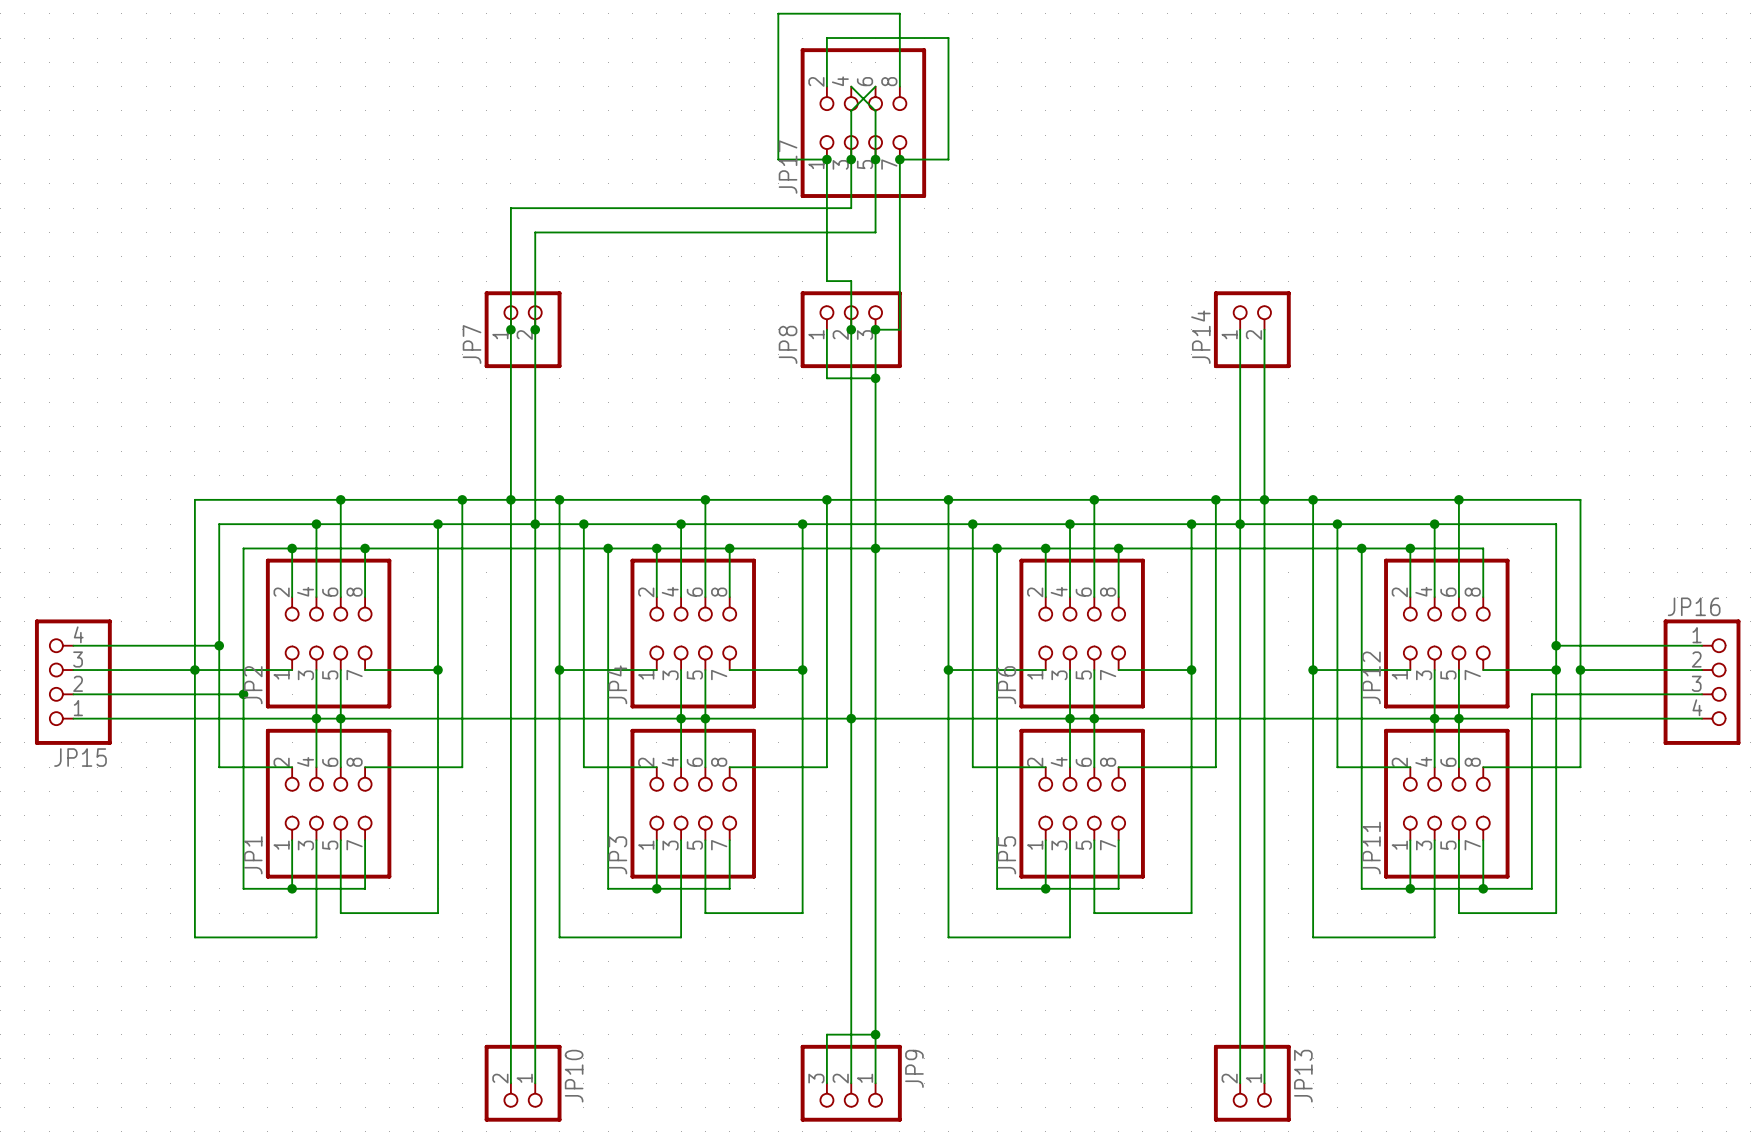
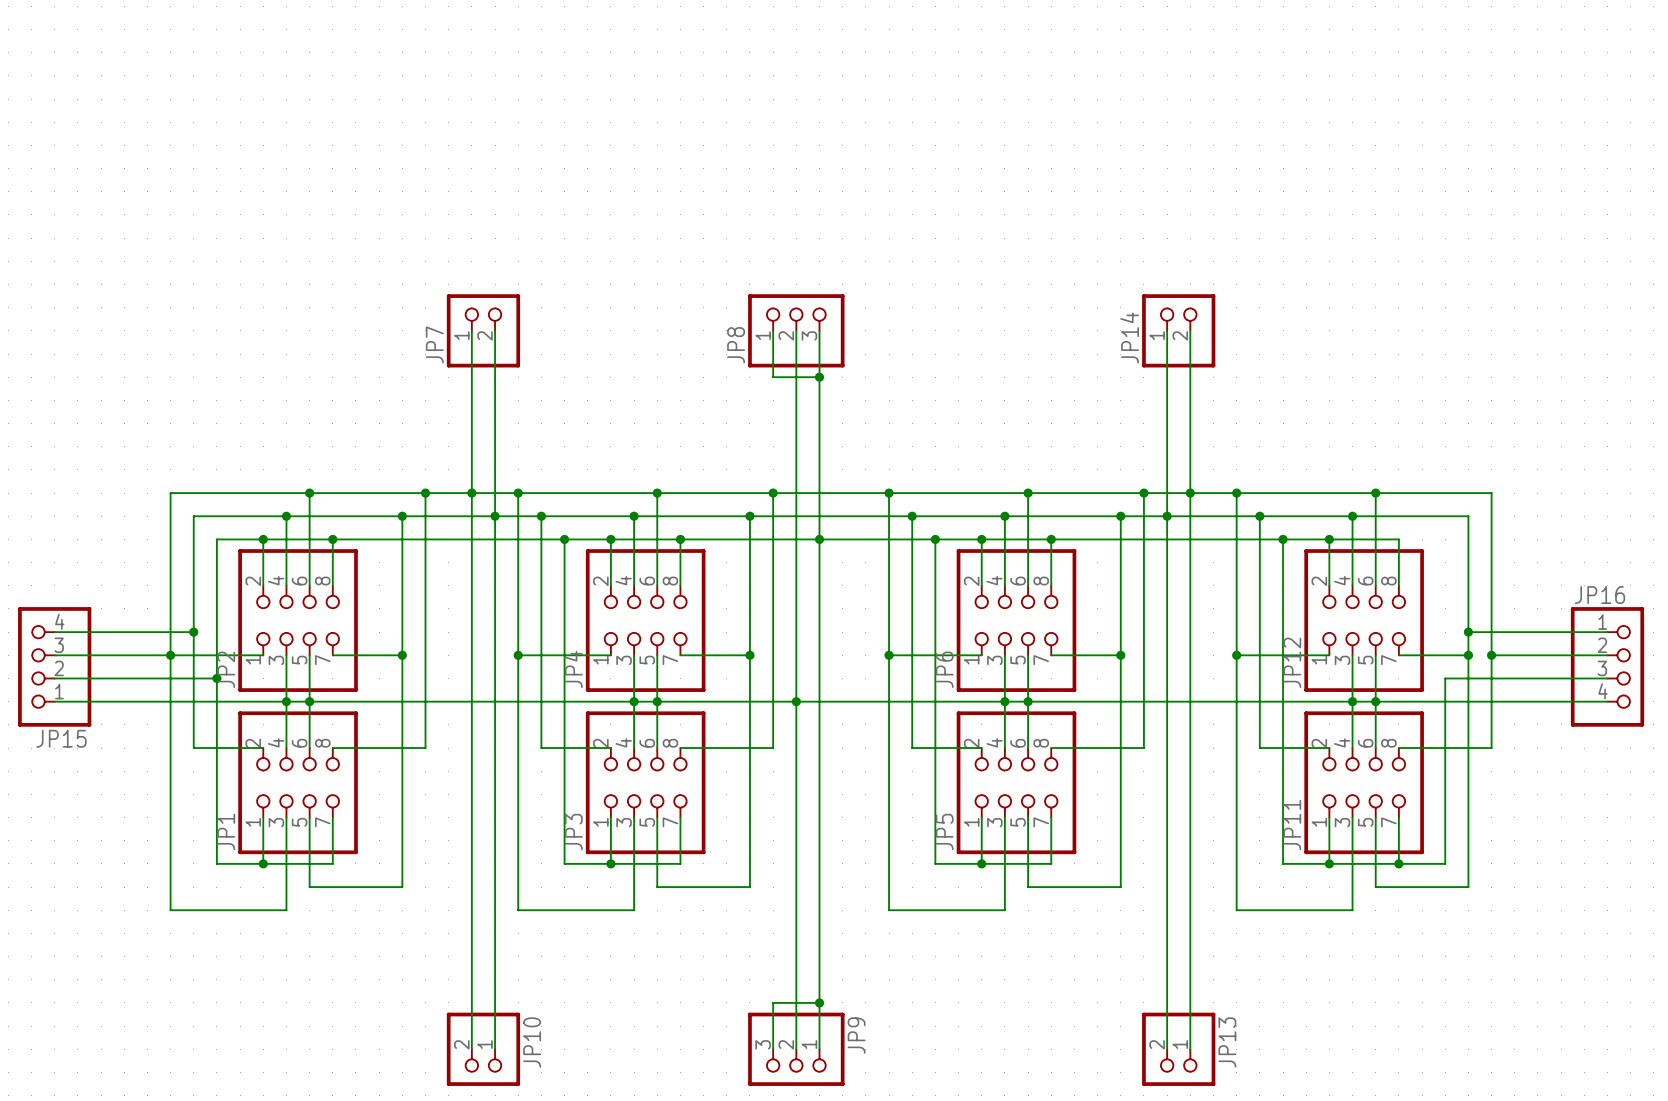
wire: (826, 86) (826, 38) (948, 38) (948, 159) (899, 159) (899, 329) (875, 329) -> none
wire: (851, 86) (875, 110) (875, 232) (535, 232) (535, 329) -> none
wire: (875, 86) (851, 110) (851, 208) (510, 208) (510, 329) -> none
wire: (899, 86) (899, 13) (778, 13) (778, 159) (826, 159) (826, 281) (851, 281) (851, 329) -> none
JP17: (863, 123) -> none
junction: (826, 159) -> none
junction: (851, 159) -> none
junction: (875, 159) -> none
junction: (899, 159) -> none
junction: (510, 329) -> none
junction: (535, 329) -> none
junction: (851, 329) -> none
junction: (875, 329) -> none

